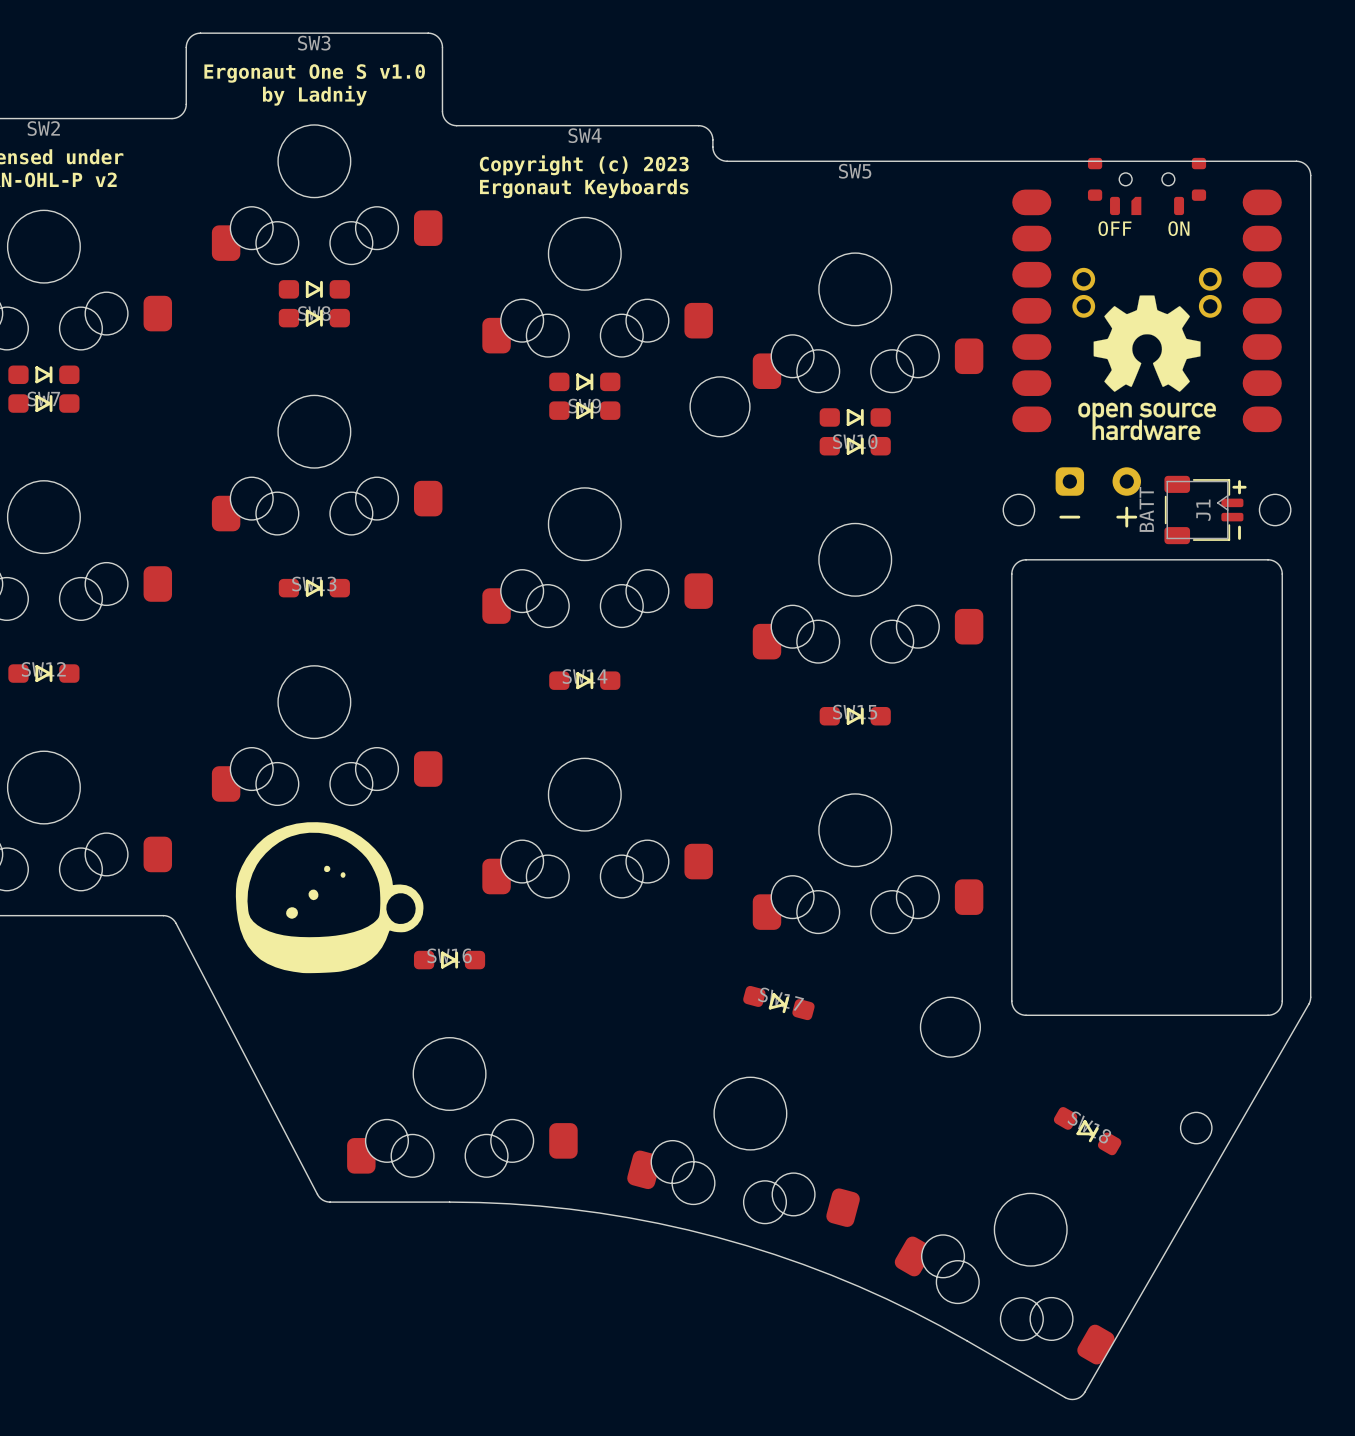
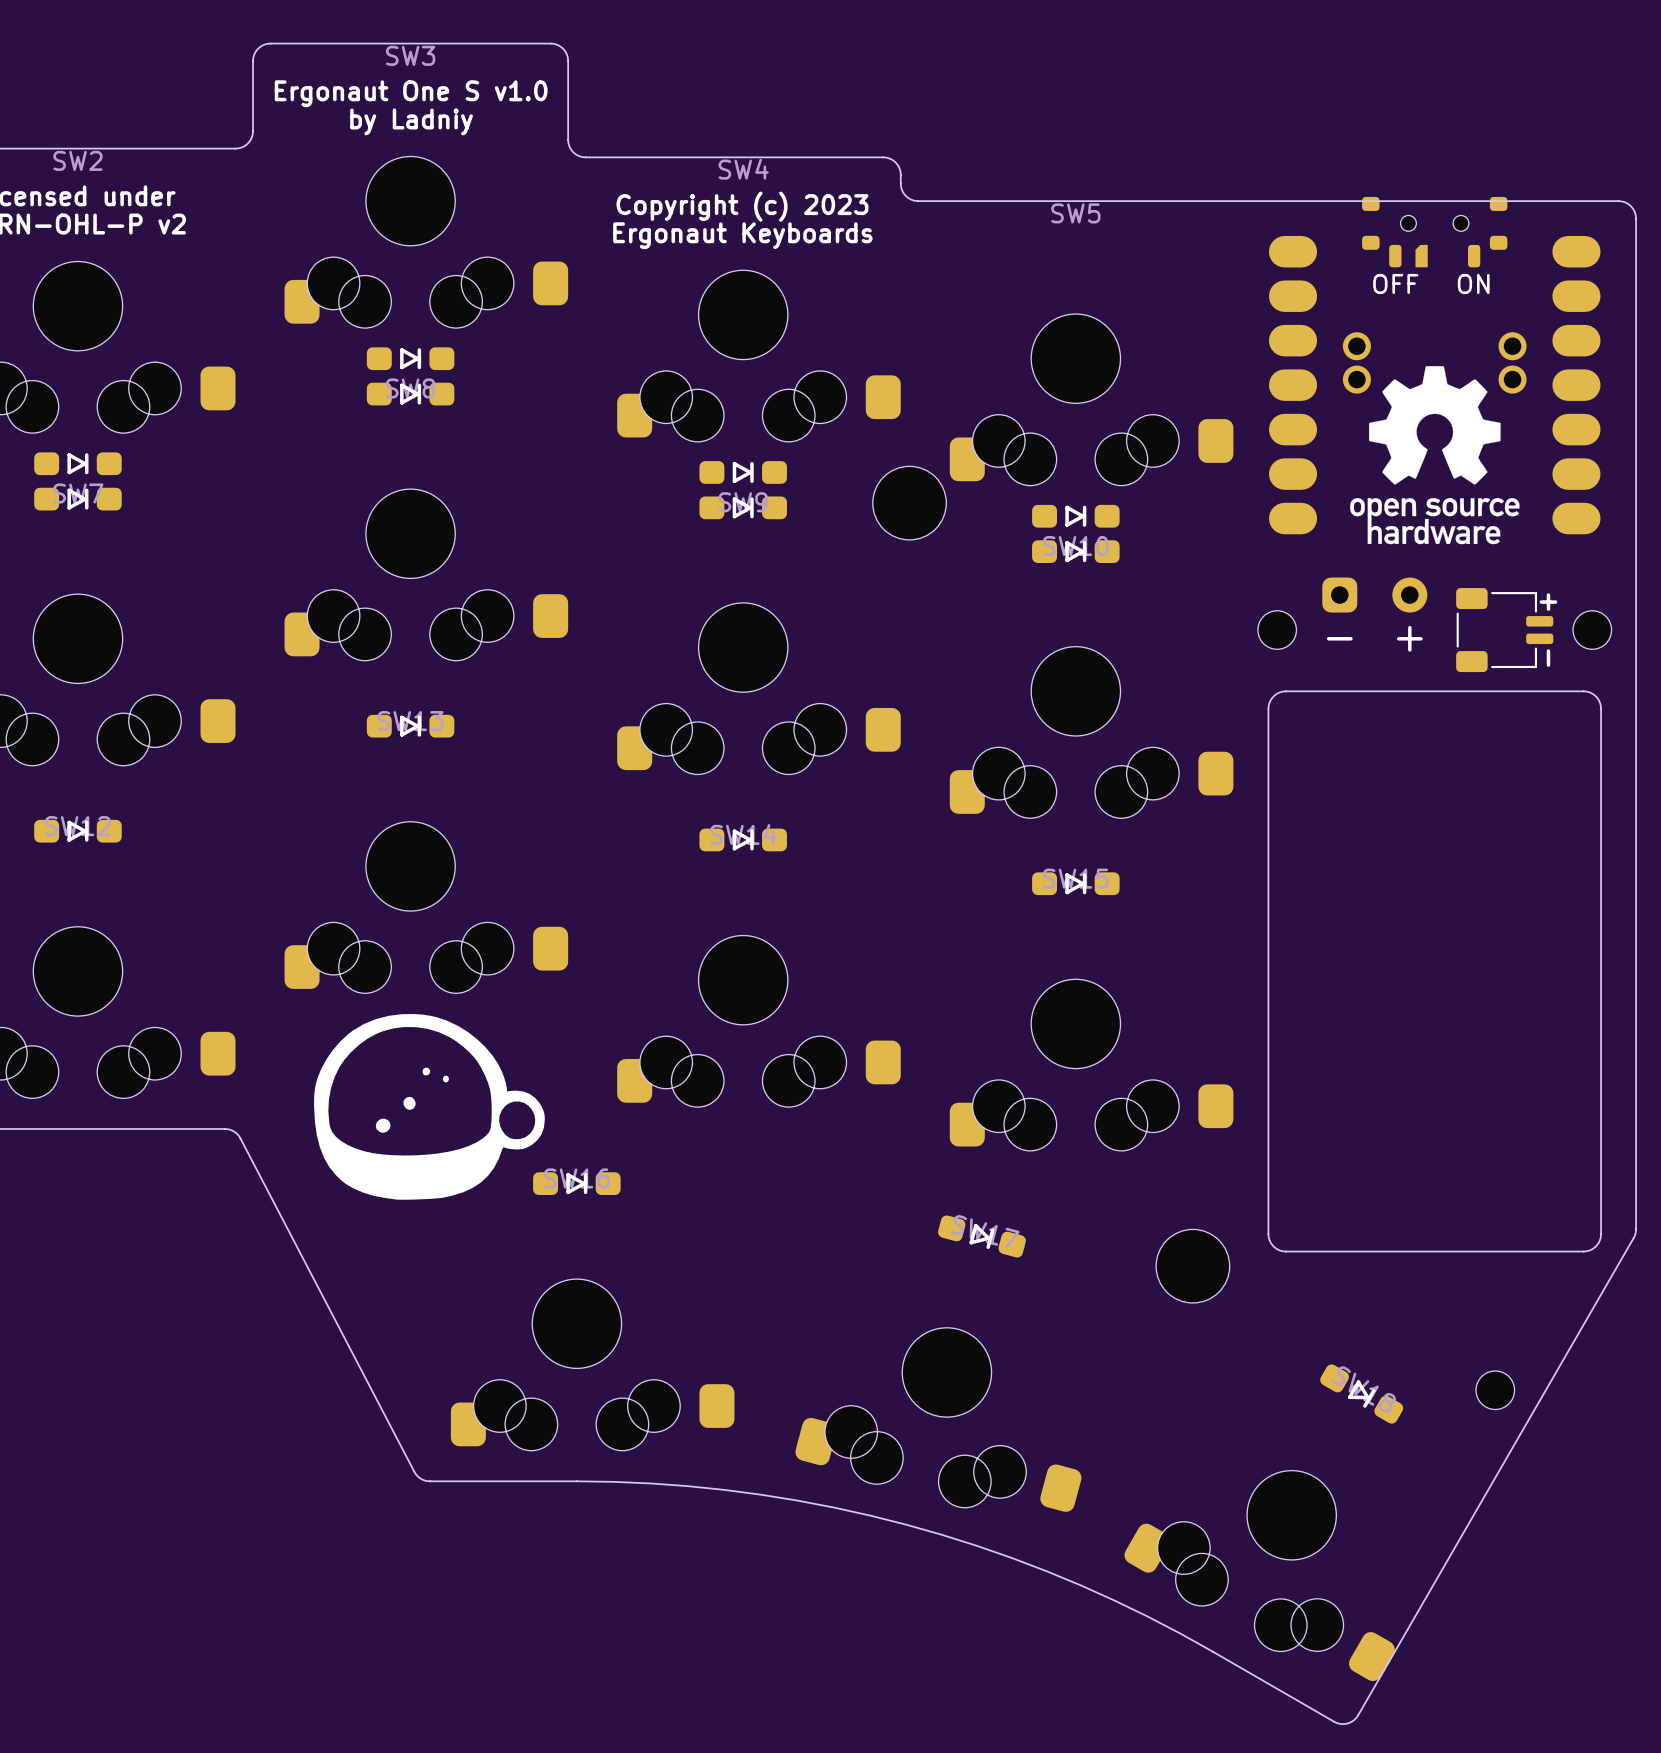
J1 side: top (1205, 509) -> bottom (1506, 630)

